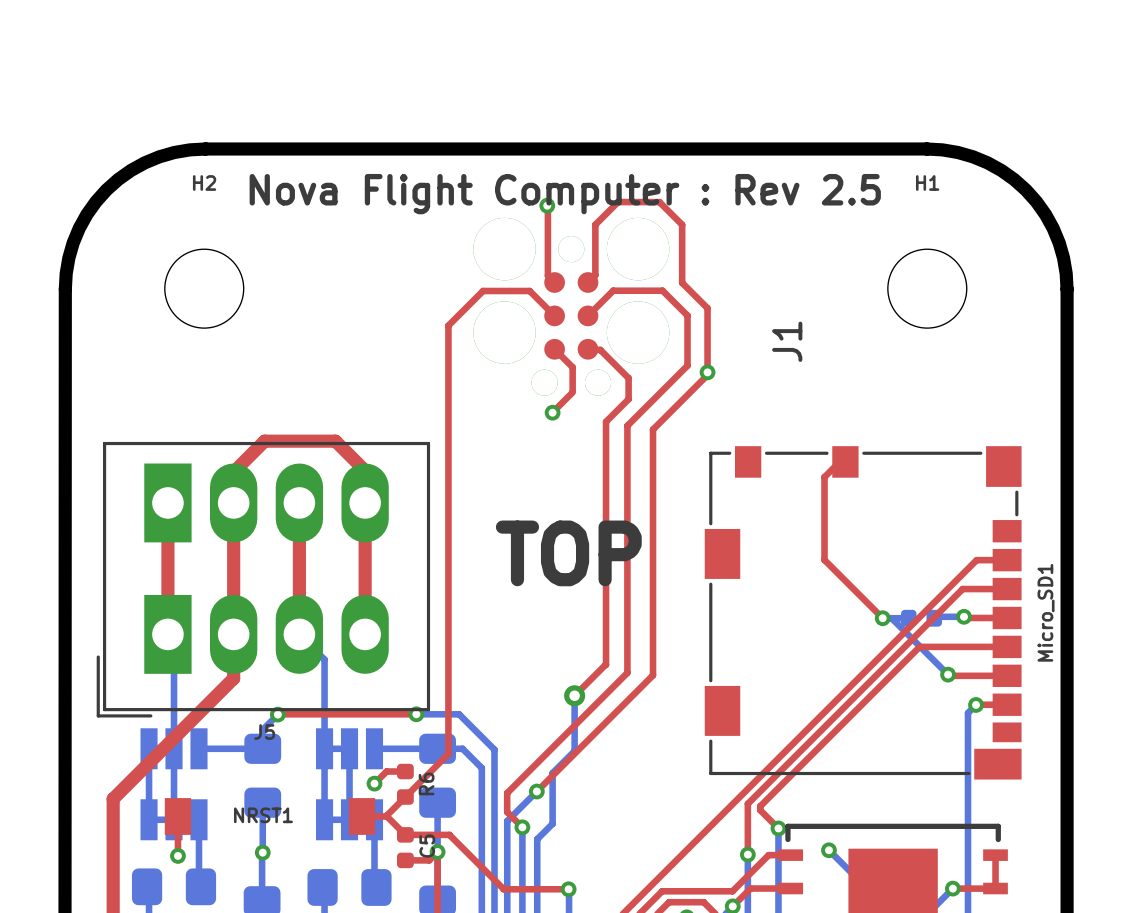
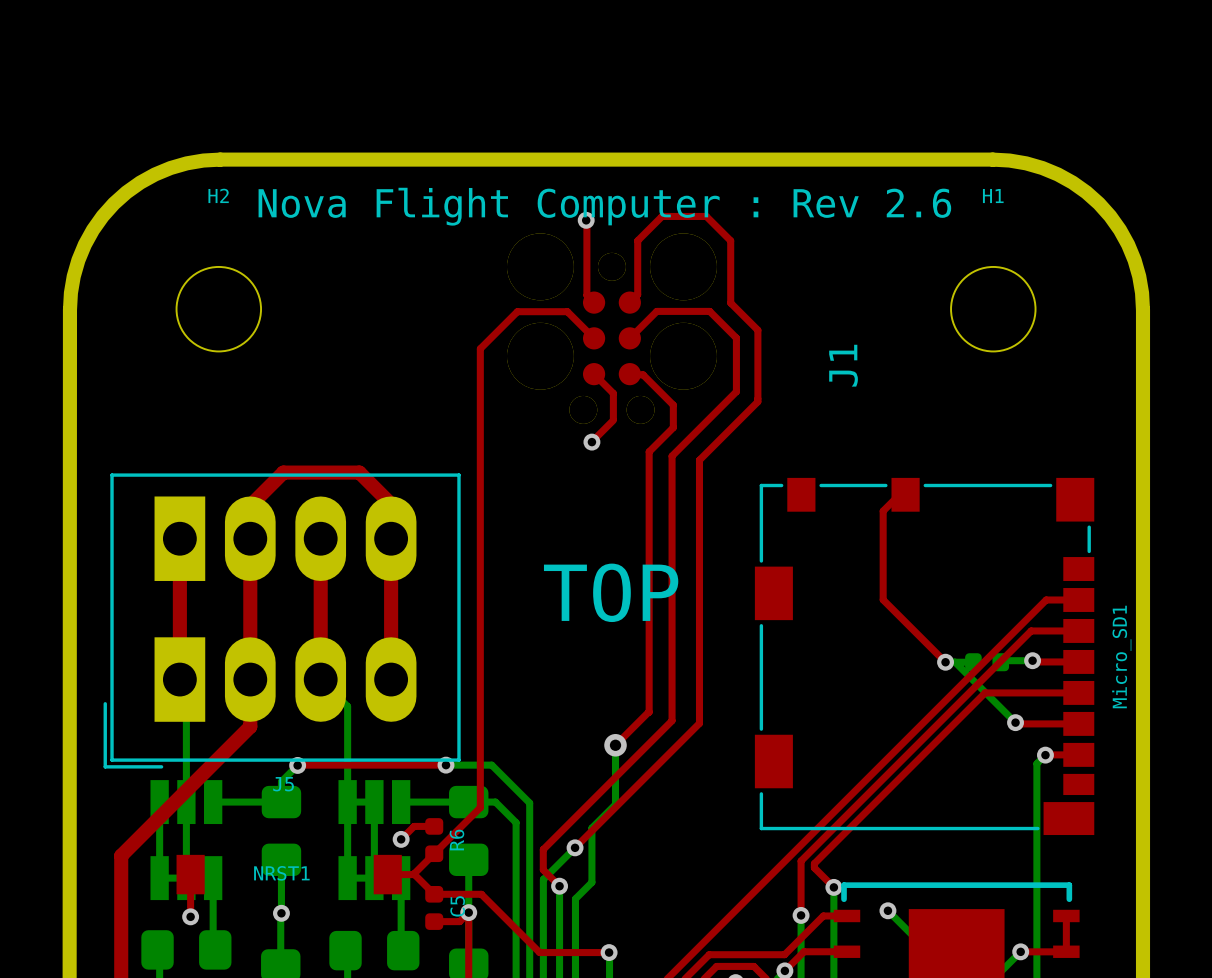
text: Nova Flight Computer : Rev 2.5 (565, 194) -> Nova Flight Computer : Rev 2.6 (604, 206)
via: (707, 372) -> none

